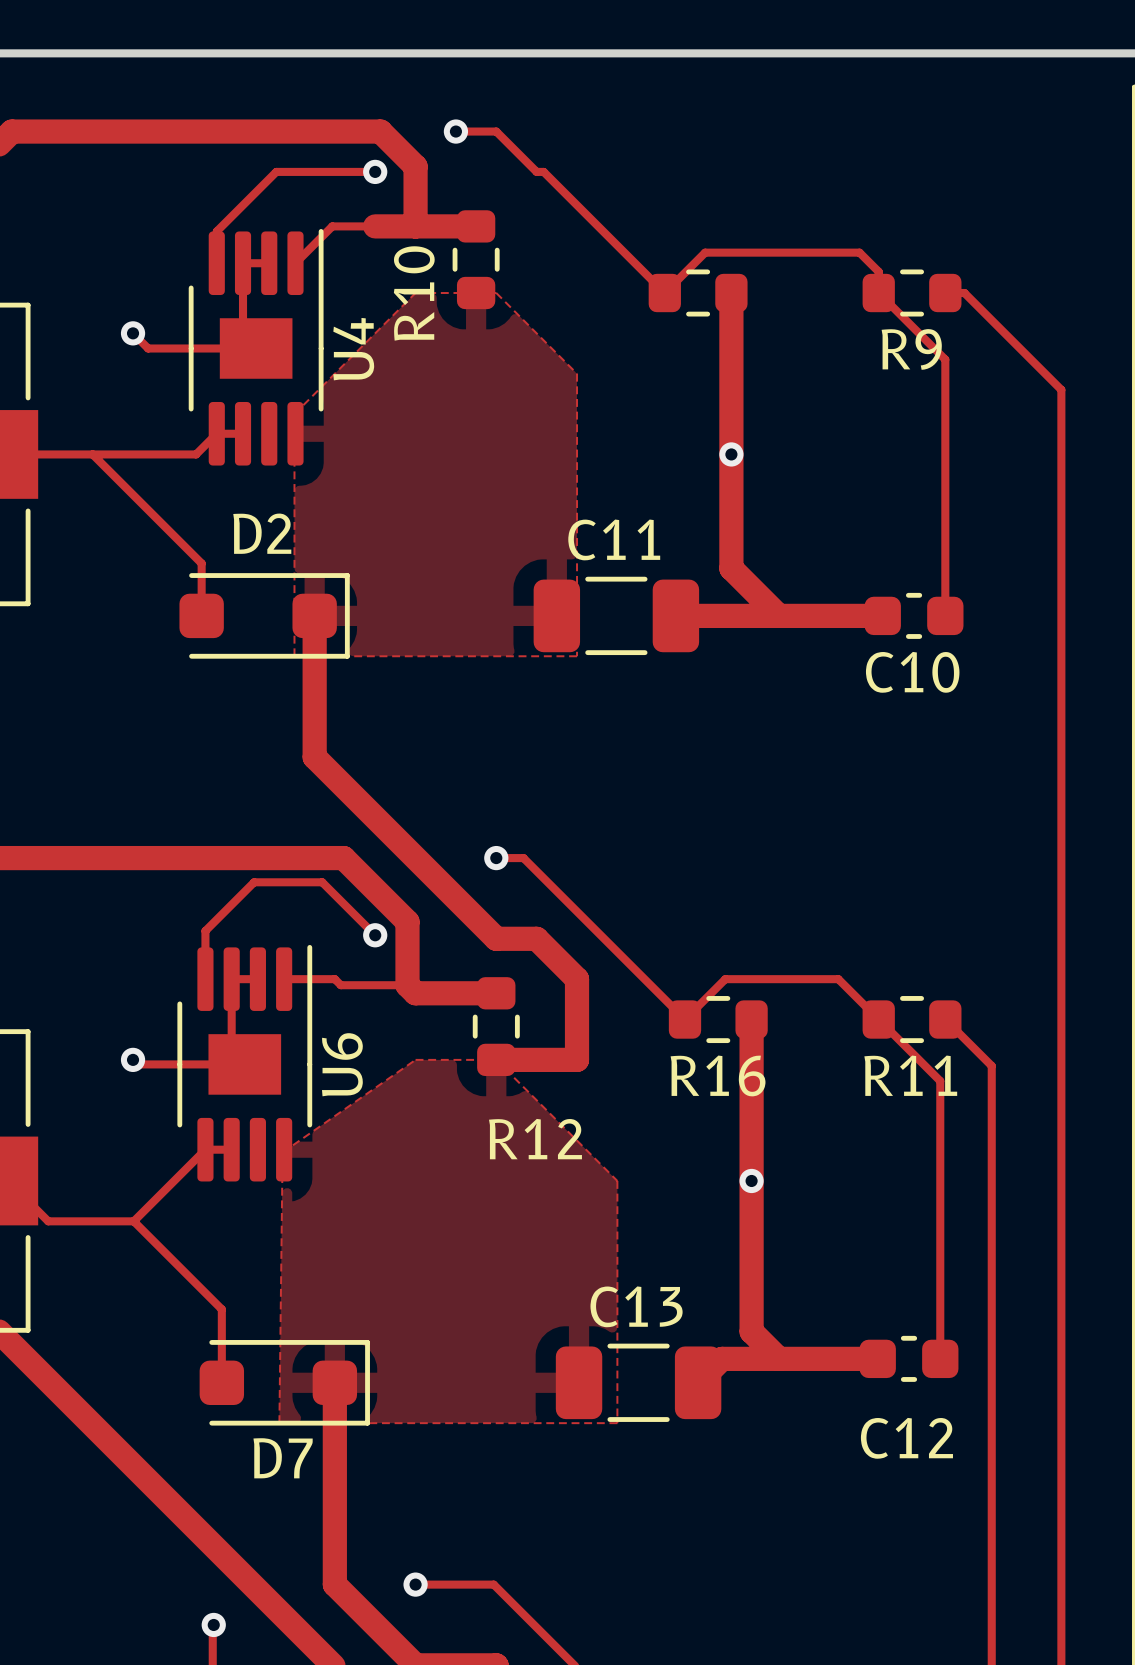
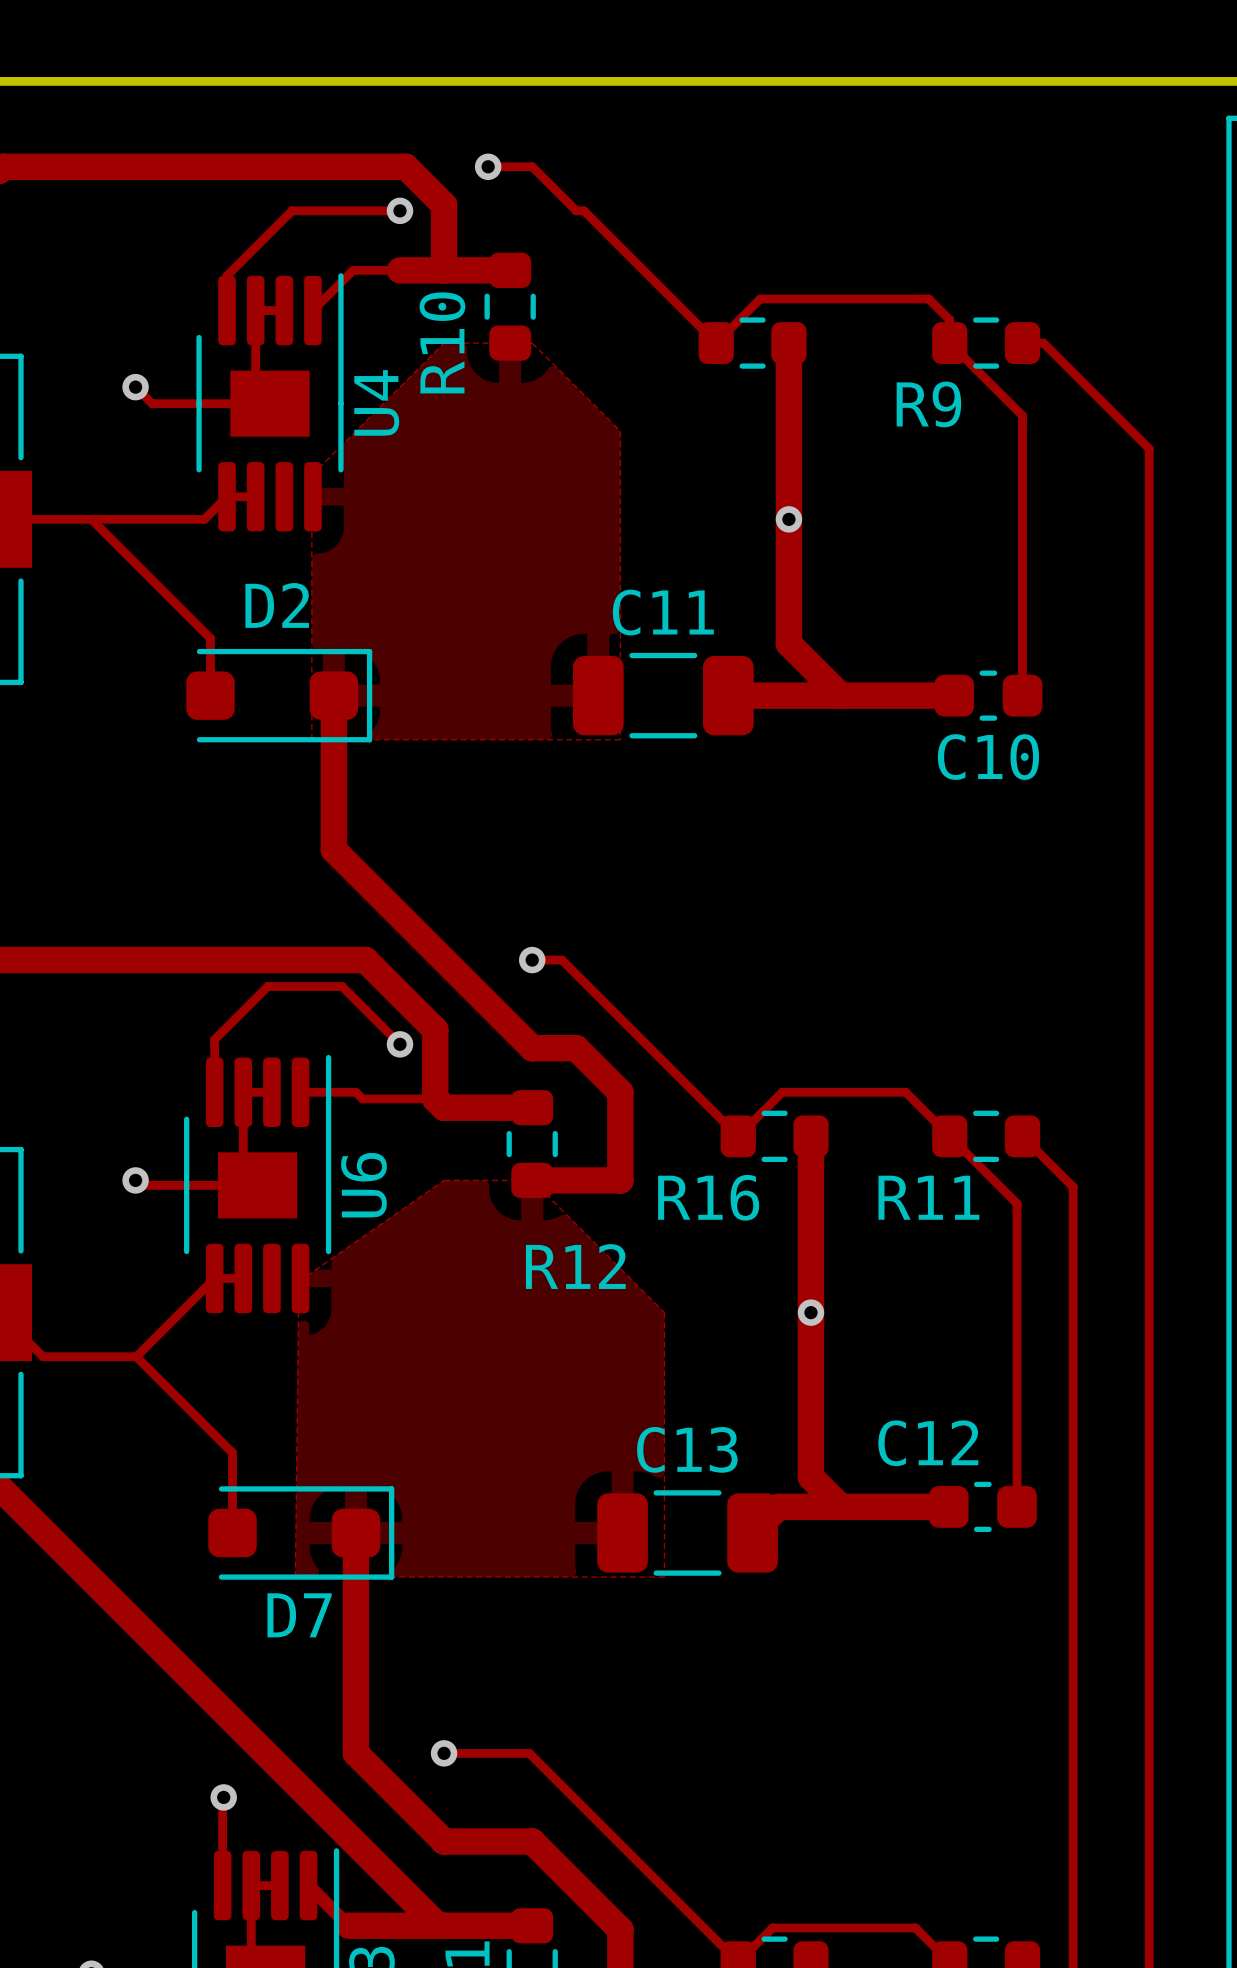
R9 name position: R9 (911, 349) -> R9 (928, 404)
R16 name position: R16 (718, 1075) -> R16 (708, 1197)
R11 name position: R11 (910, 1075) -> R11 (928, 1197)
C12 name position: C12 (906, 1438) -> C12 (928, 1443)

